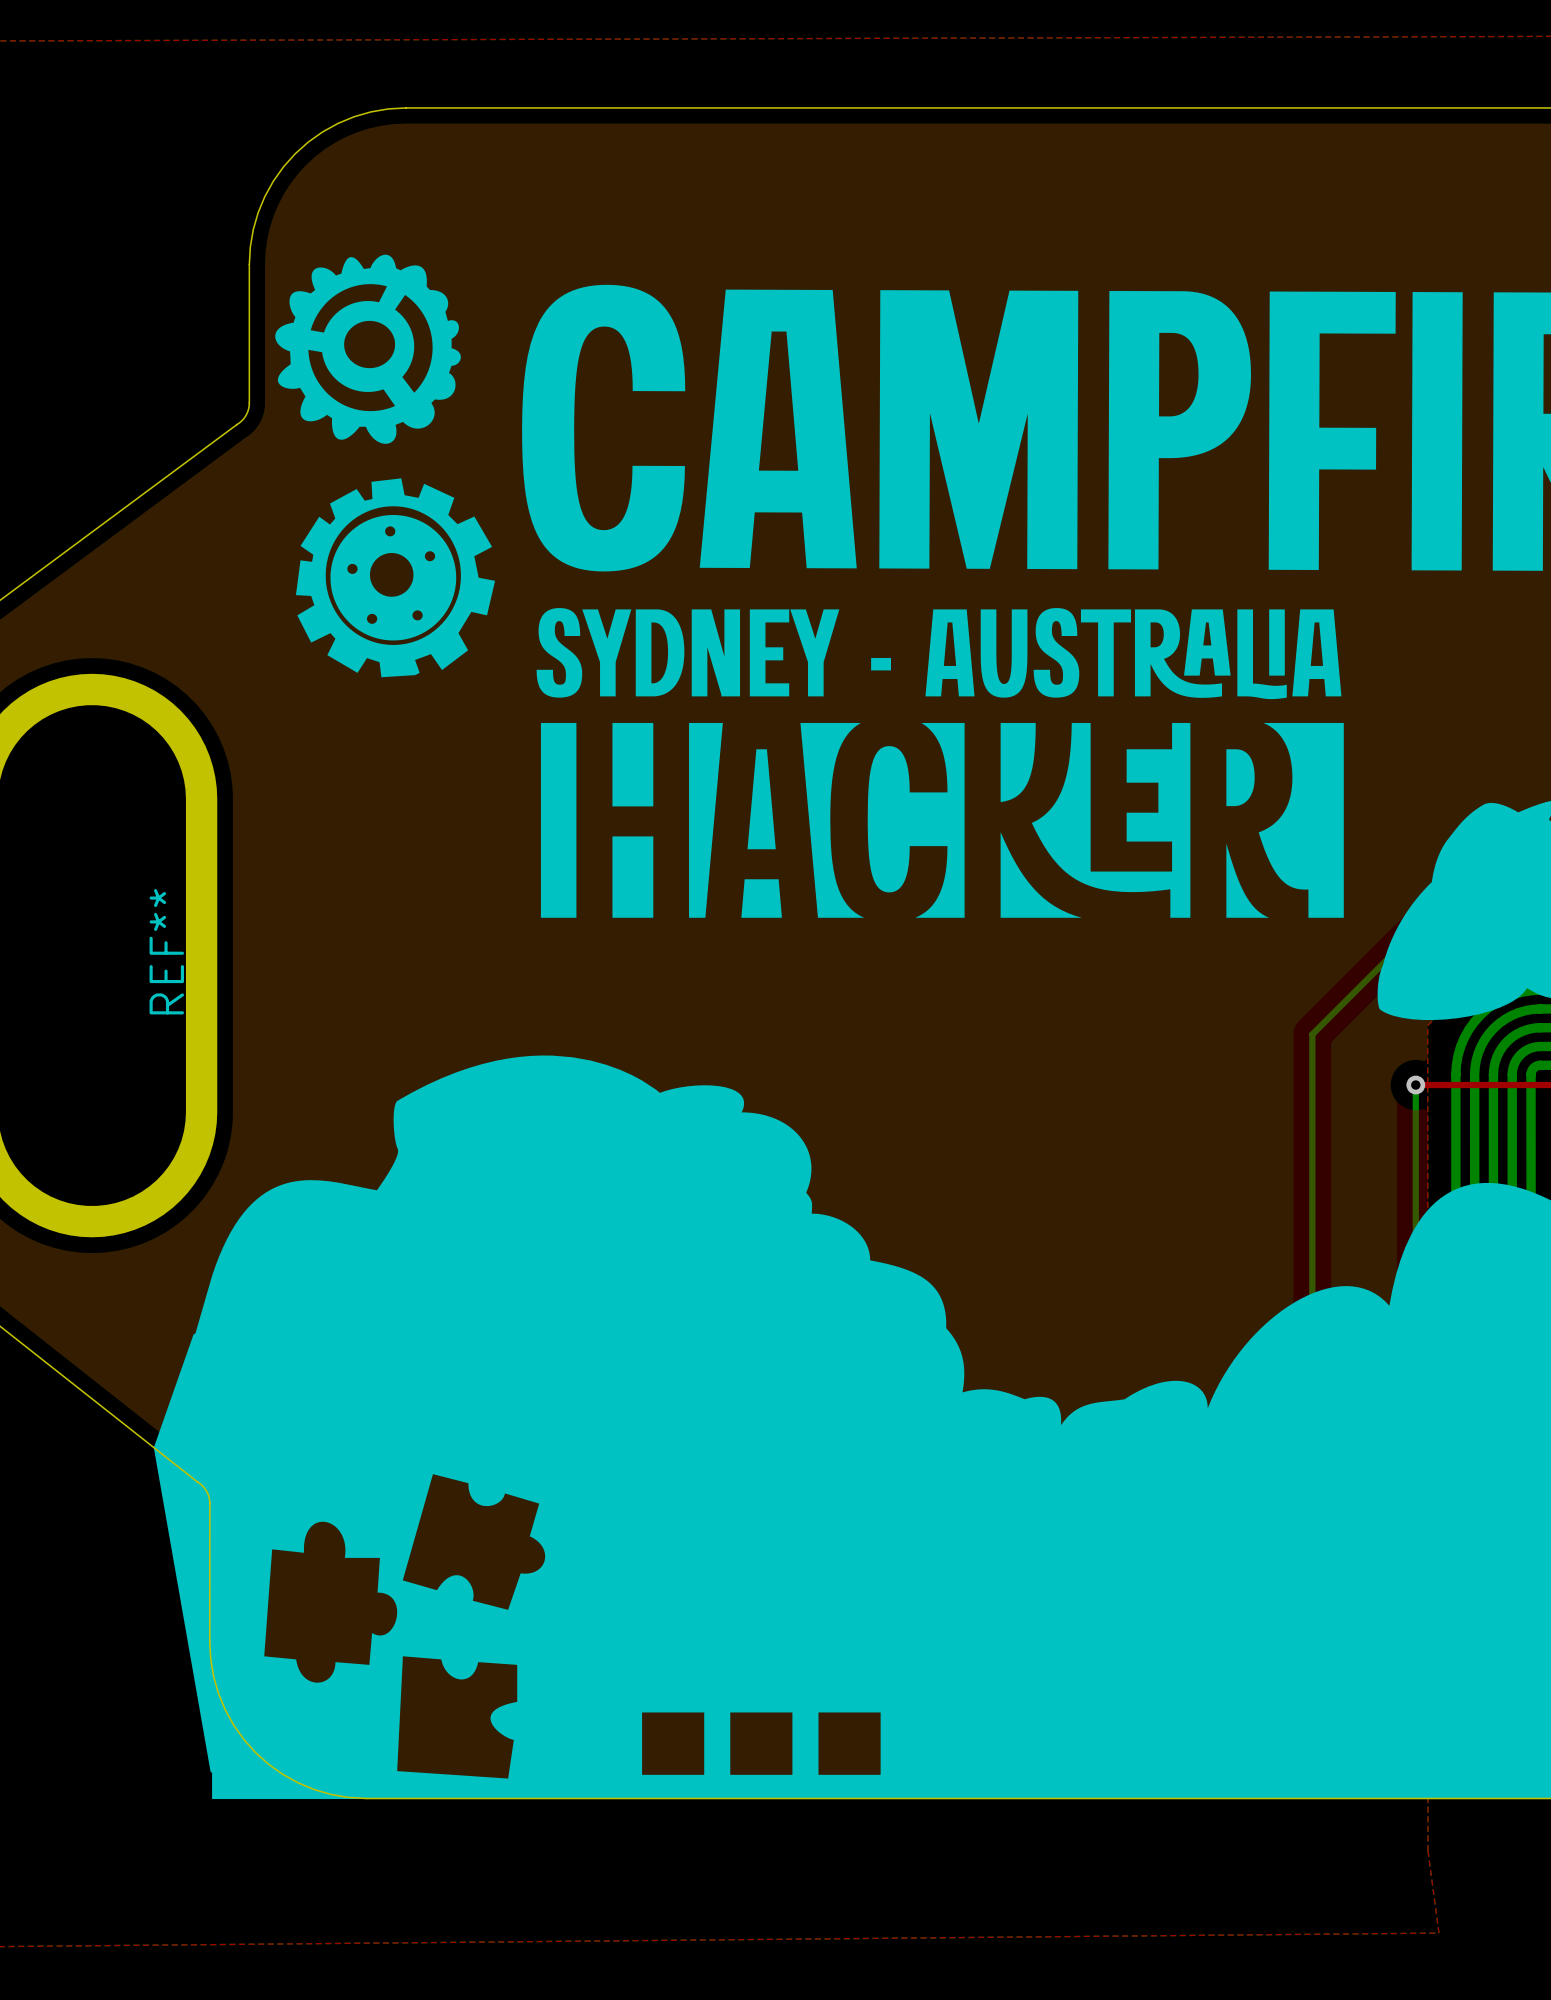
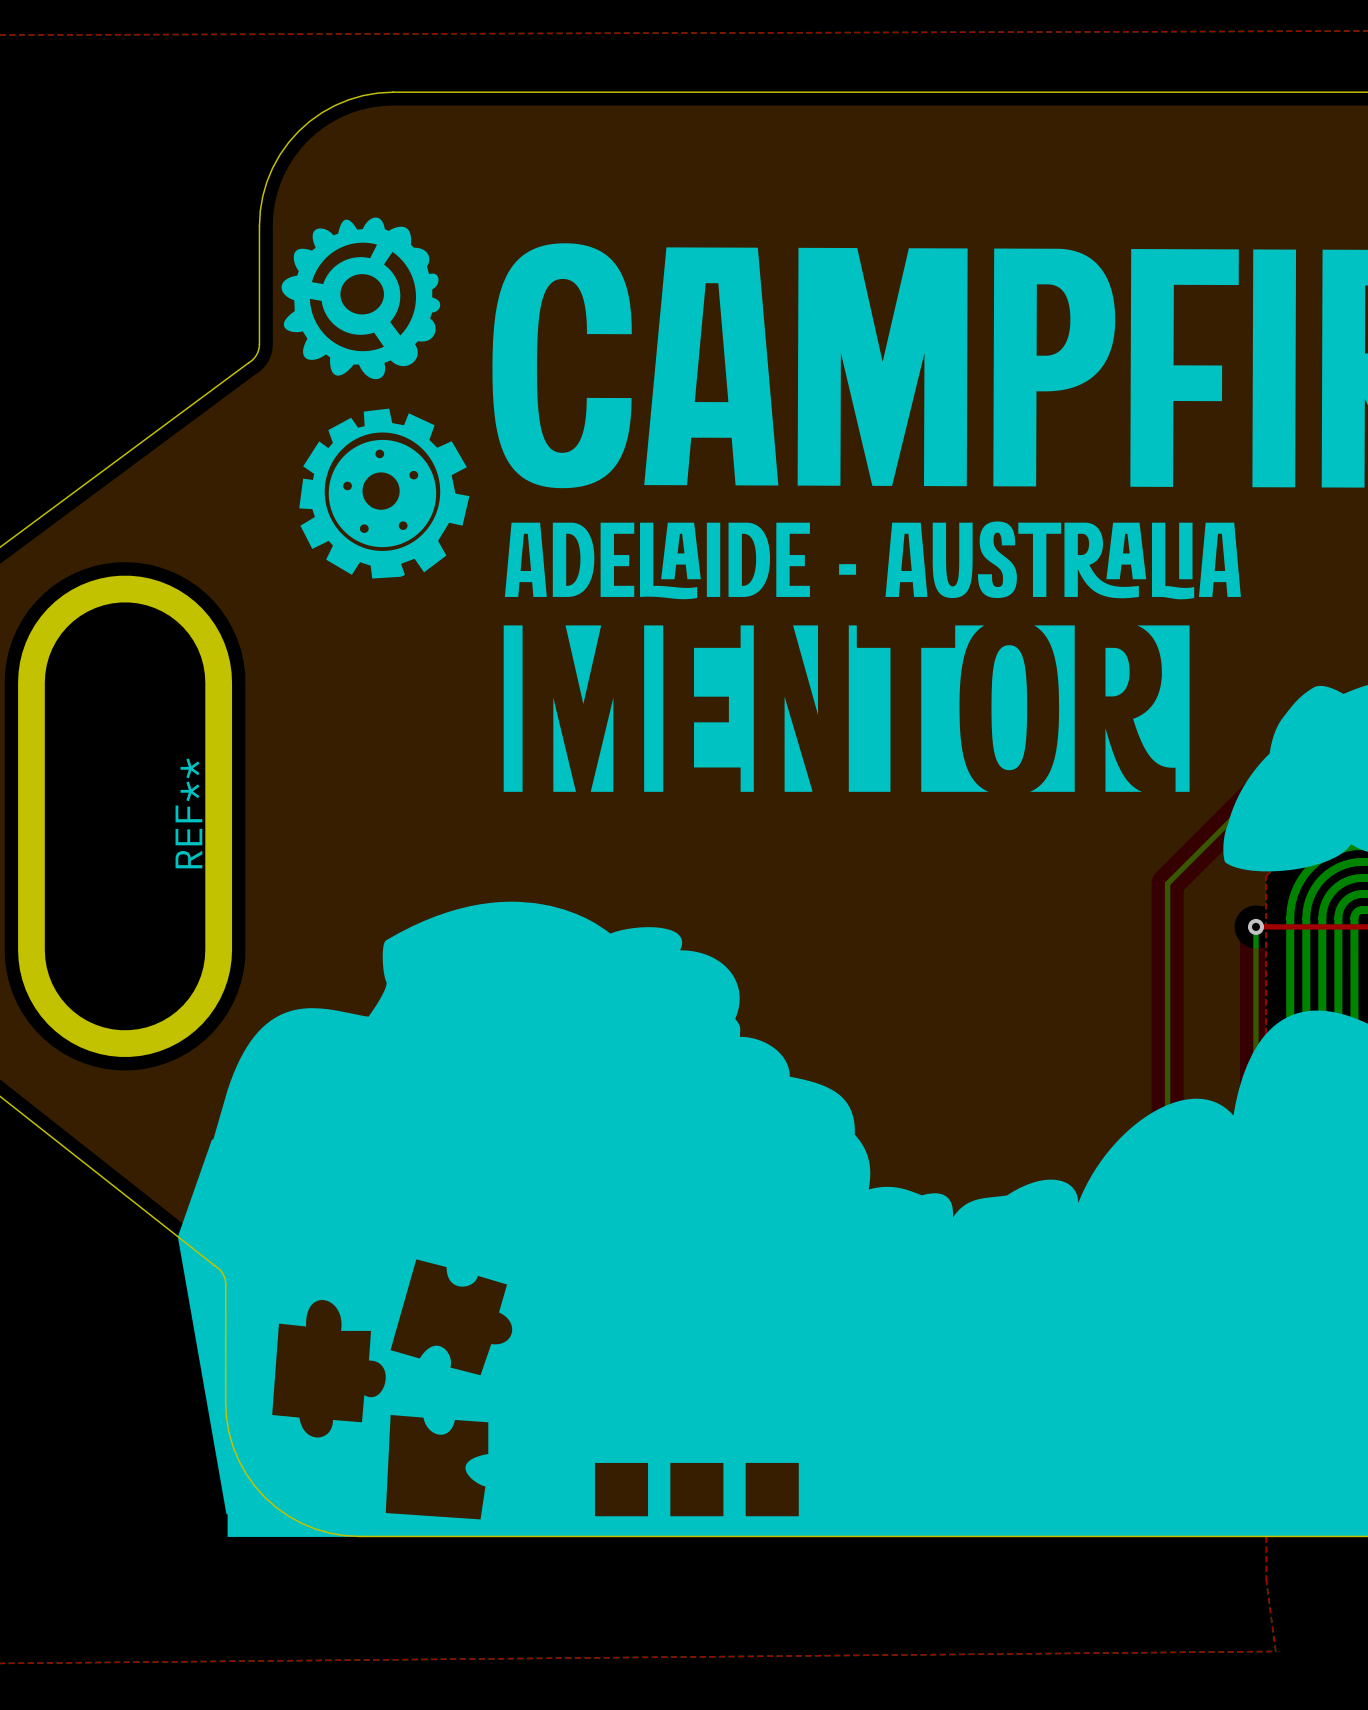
drawing shape: [536, 608, 583, 698] -> [504, 522, 547, 597]
drawing: [582, 609, 632, 697] -> none
drawing shape: [691, 609, 741, 697] -> [639, 522, 698, 600]
drawing shape: [749, 609, 790, 697] -> [706, 522, 721, 597]
drawing shape: [790, 609, 840, 697] -> [728, 522, 771, 597]
drawing: none -> [600, 522, 701, 597]
drawing: none -> [693, 522, 989, 792]
drawing position: (1207, 642) -> (1126, 550)
drawing position: (1276, 642) -> (1185, 550)
drawing position: (660, 652) -> (573, 559)
drawing position: (950, 652) -> (906, 559)
drawing position: (1056, 652) -> (997, 559)
drawing position: (1105, 652) -> (1039, 559)
drawing position: (1316, 652) -> (1219, 559)
drawing position: (1004, 653) -> (952, 560)
drawing position: (1178, 653) -> (1101, 560)
drawing position: (1262, 654) -> (1173, 560)
drawing position: (881, 664) -> (847, 569)
drawing shape: [540, 722, 577, 918] -> [503, 625, 523, 792]
drawing shape: [612, 722, 654, 807] -> [565, 625, 602, 705]
drawing shape: [689, 722, 723, 918] -> [644, 625, 664, 792]
drawing: [741, 722, 1082, 918] -> none
drawing shape: [1031, 722, 1191, 918] -> [991, 645, 1028, 771]
drawing shape: [1258, 722, 1344, 918] -> [1133, 625, 1190, 792]
drawing: none -> [1030, 625, 1075, 792]
drawing position: (1240, 777) -> (1117, 672)
drawing: none -> [553, 697, 614, 792]
drawing: [612, 836, 654, 918] -> none
drawing position: (1247, 880) -> (1123, 760)

